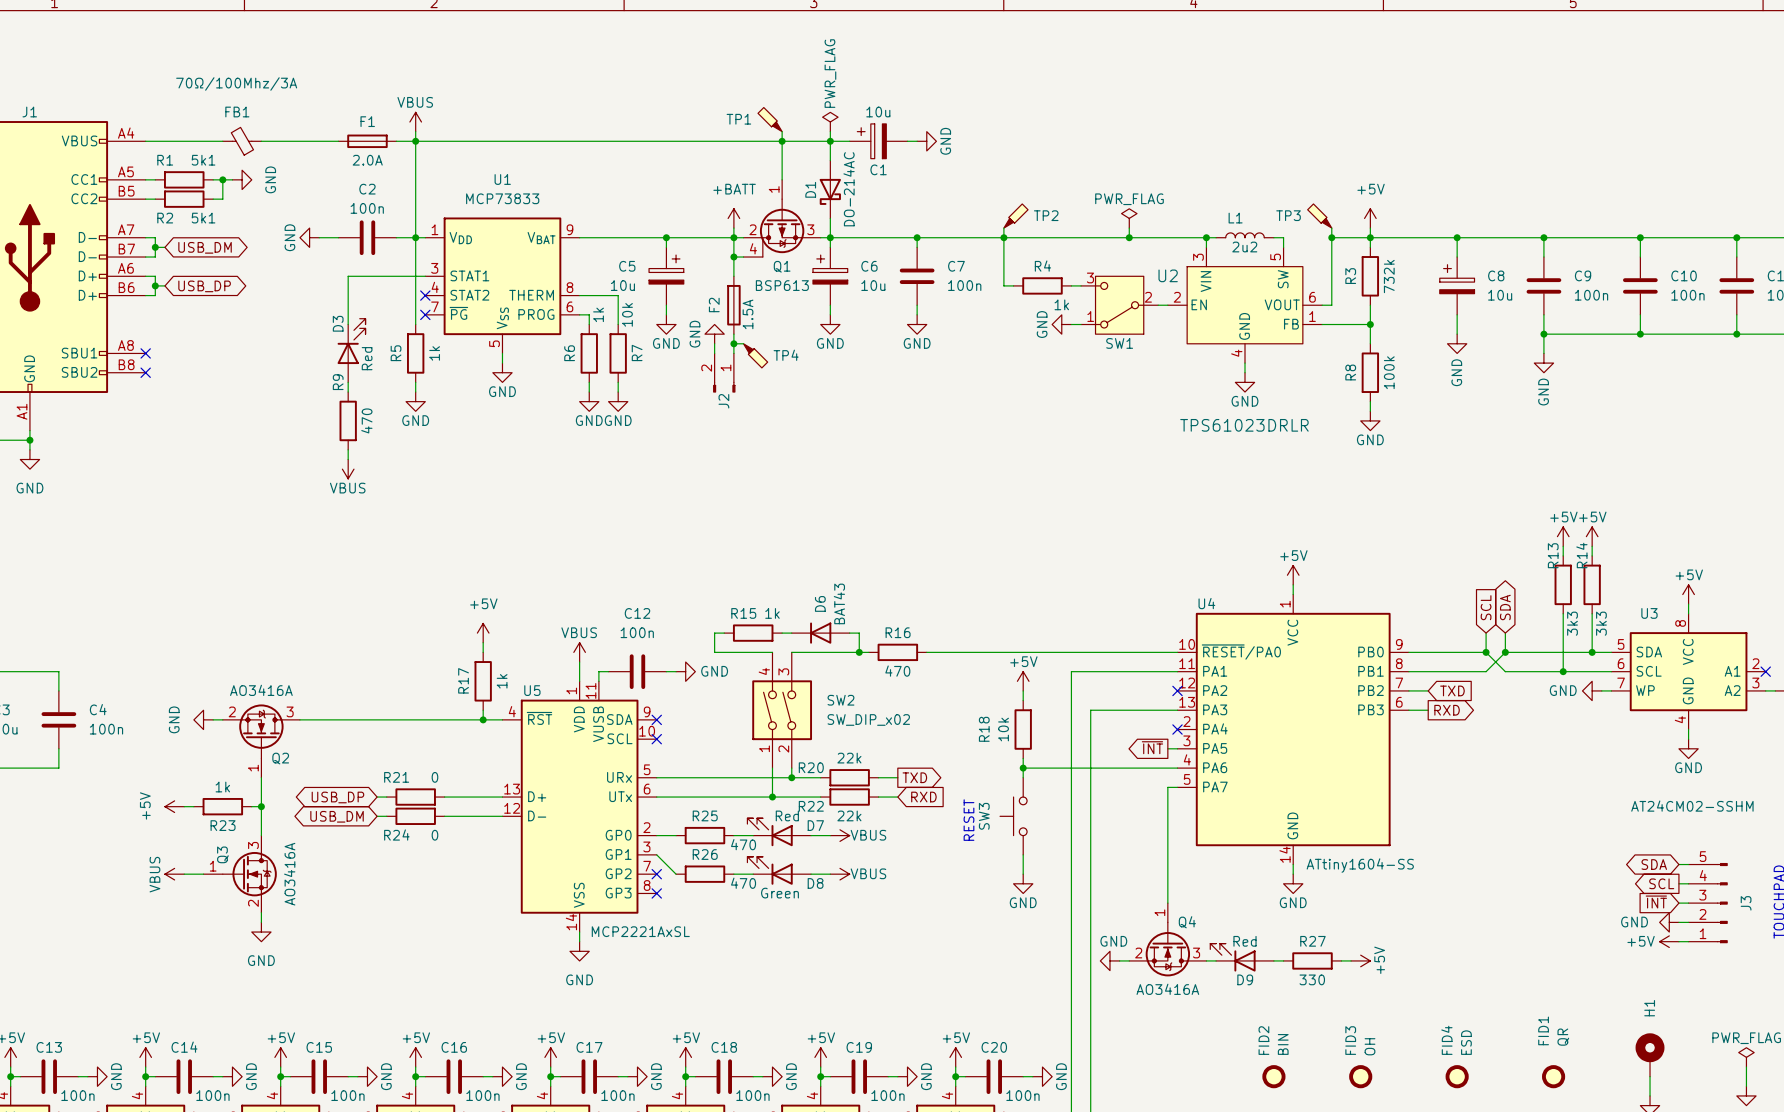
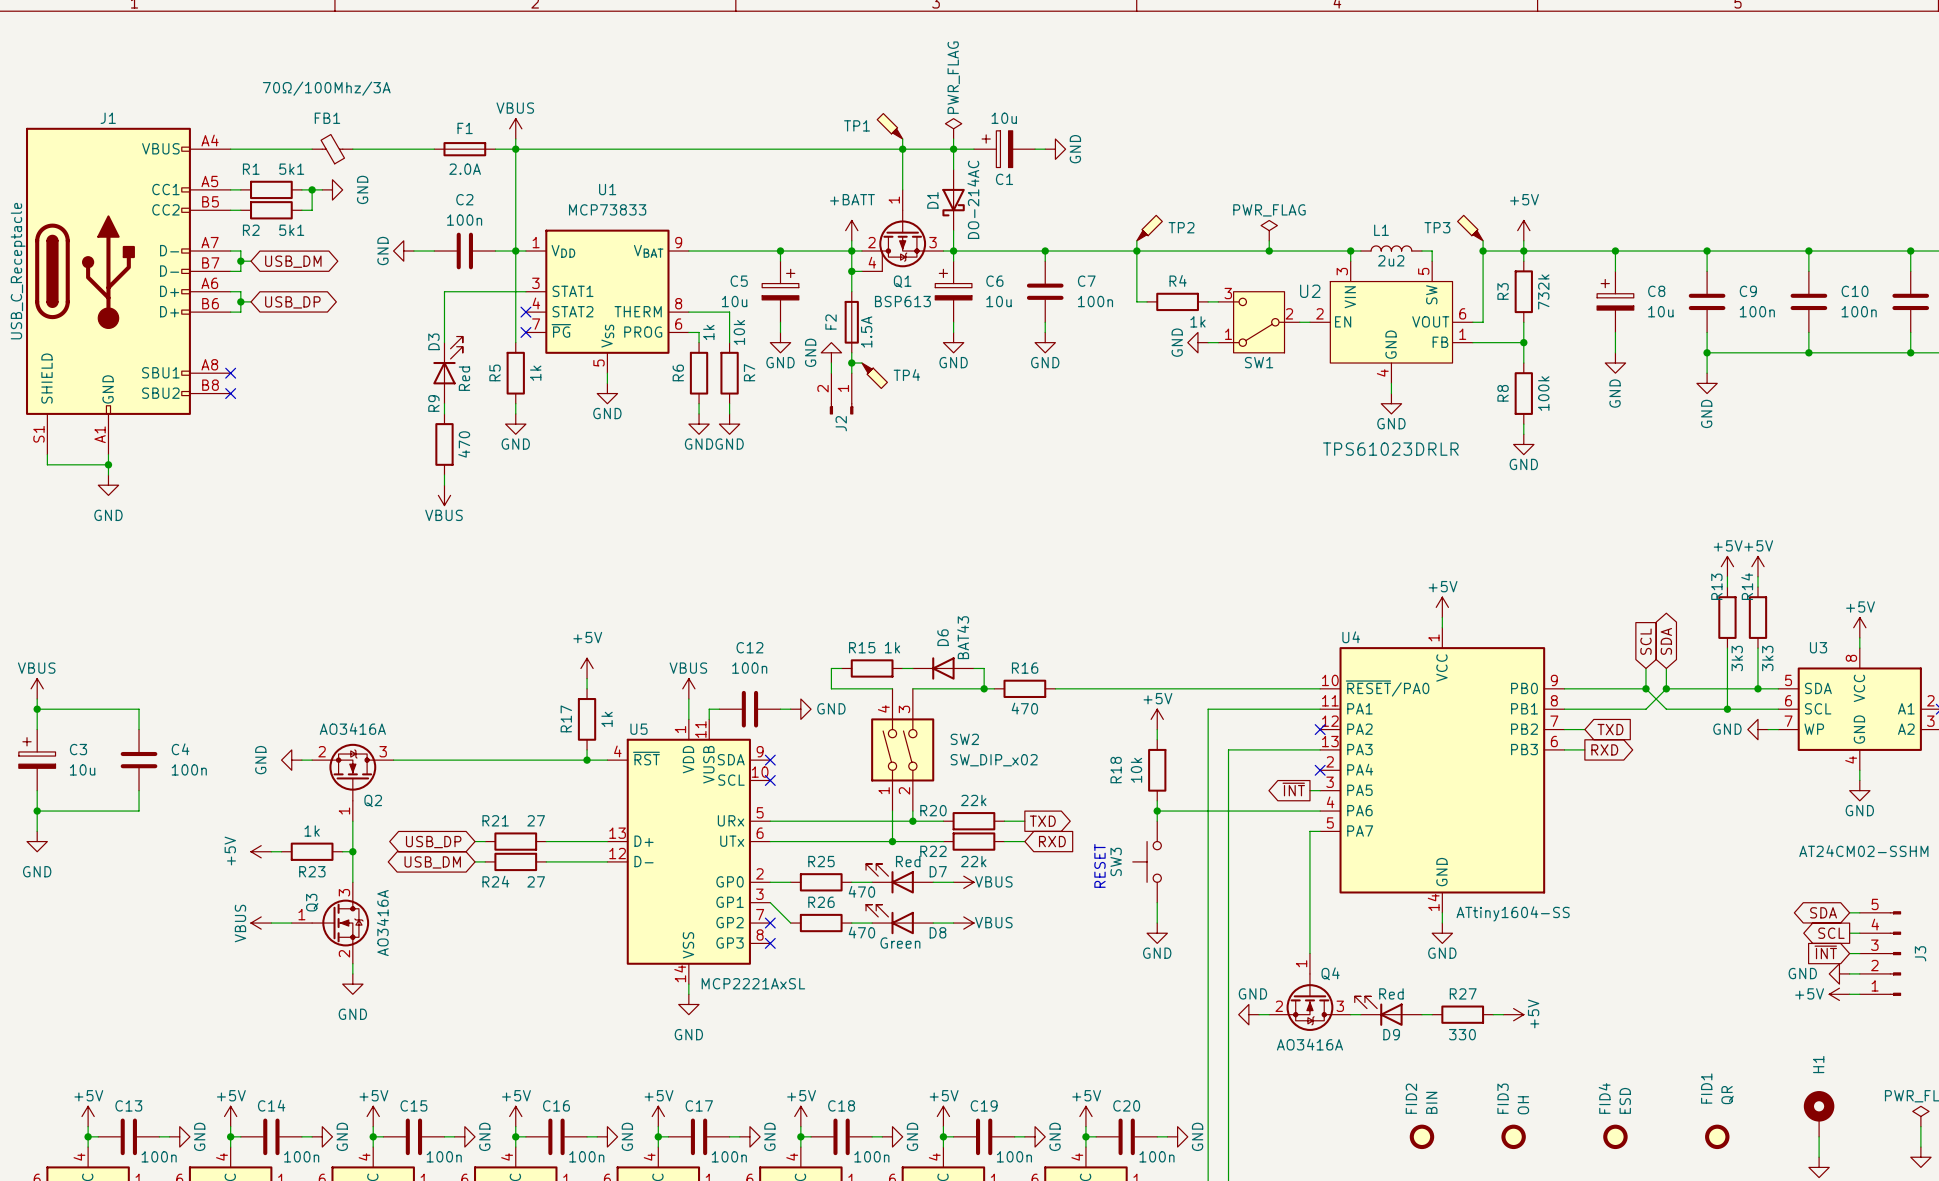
R21 value: 0 (434, 777) -> 27 (536, 820)
R24 value: 0 (434, 835) -> 27 (536, 881)

